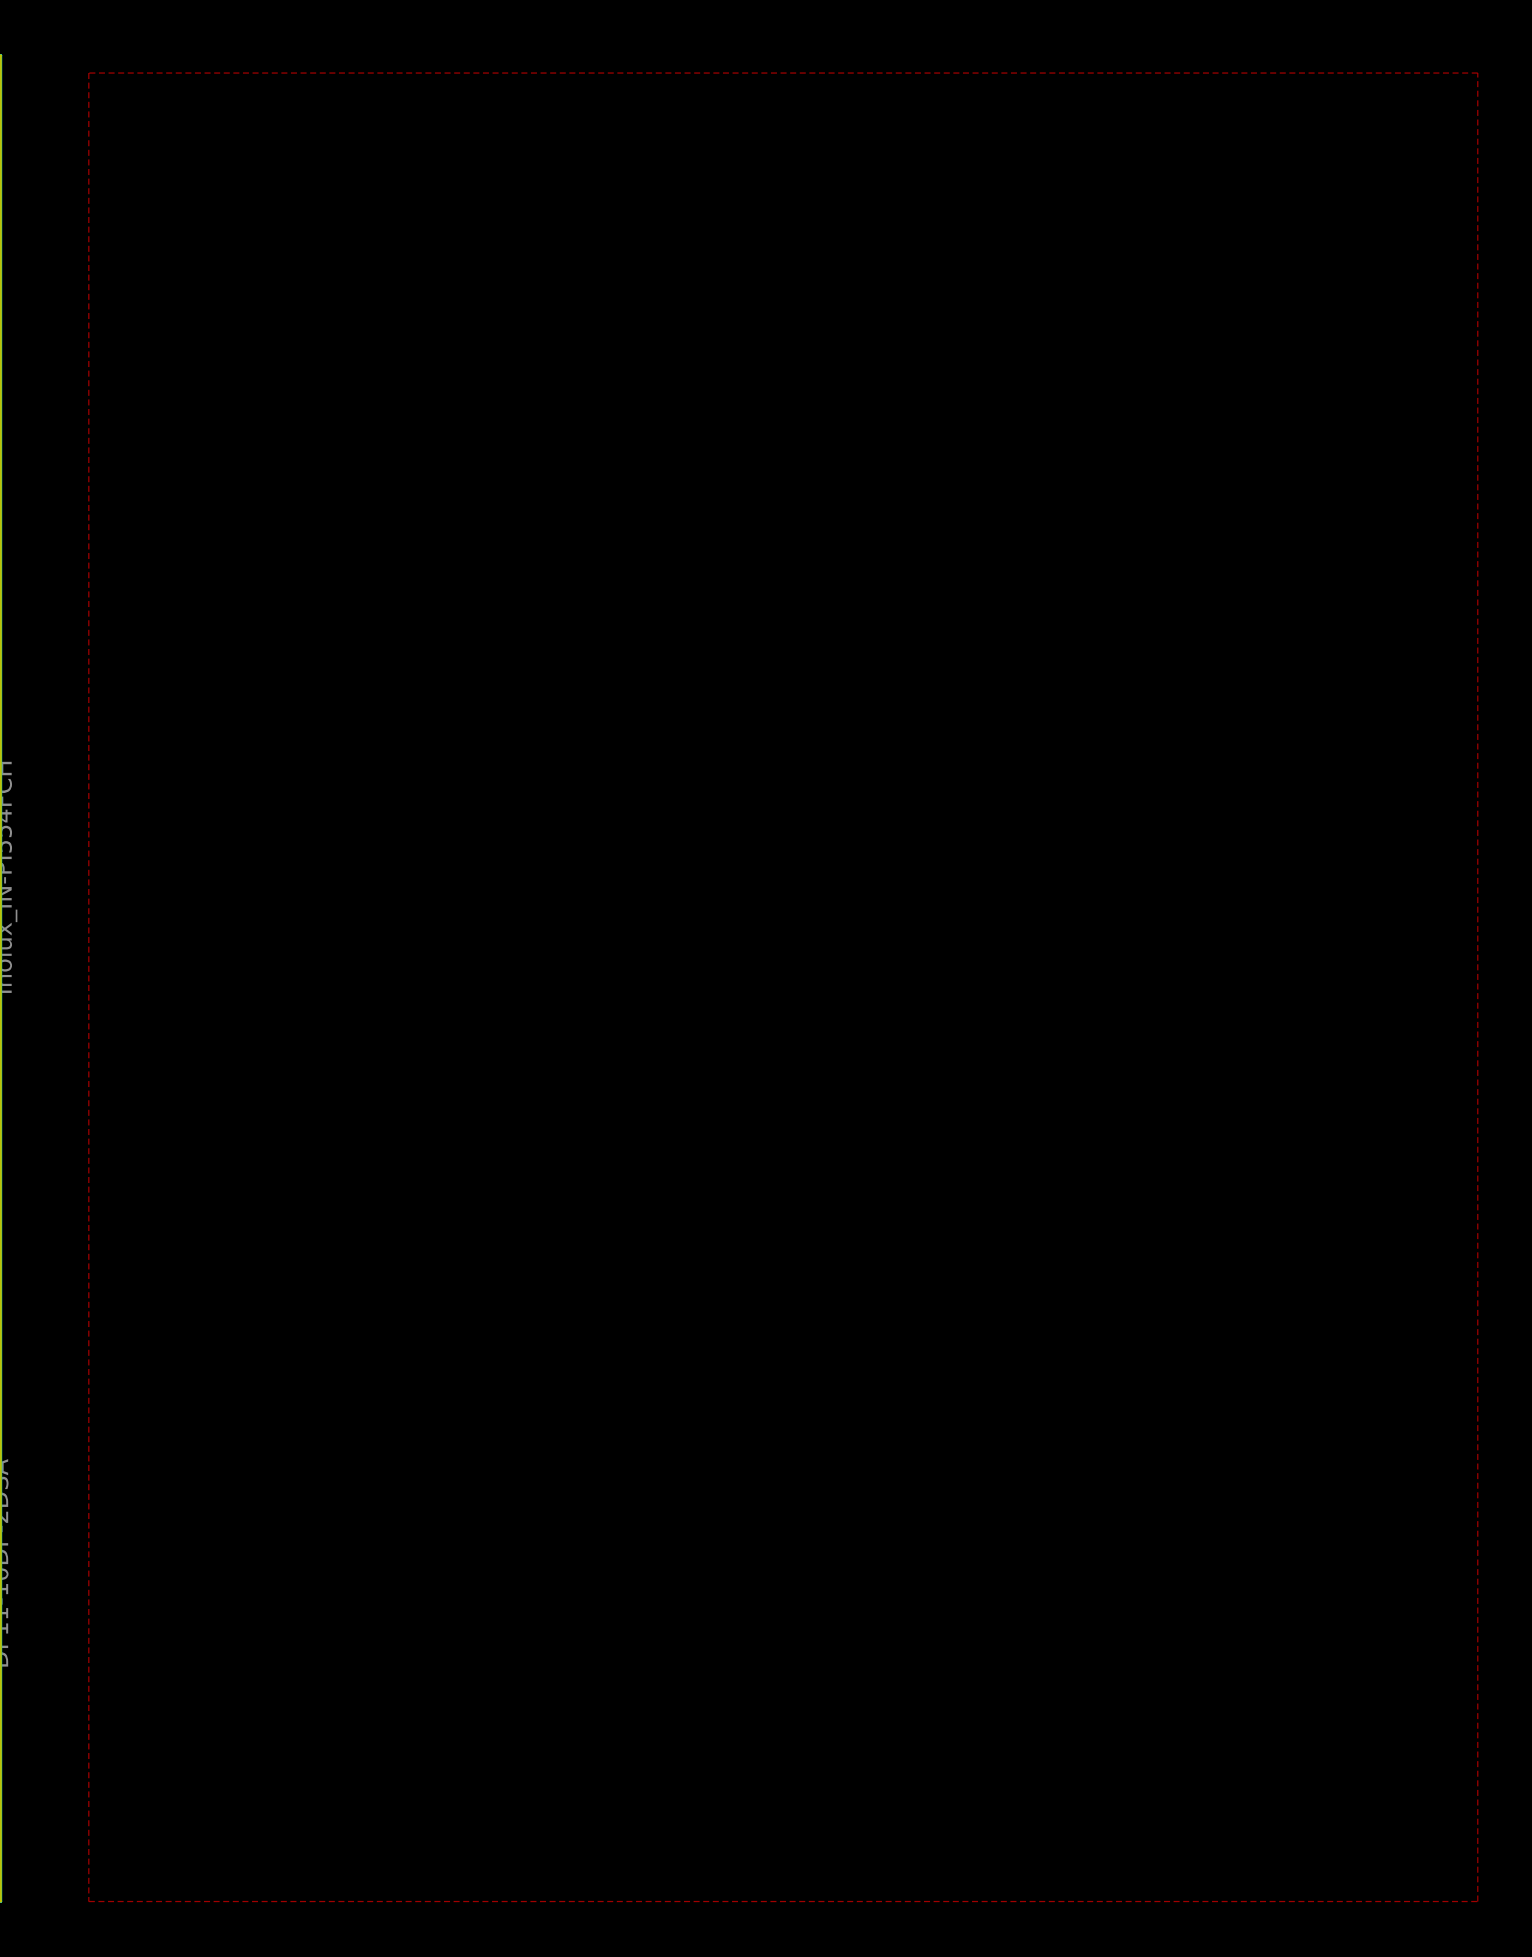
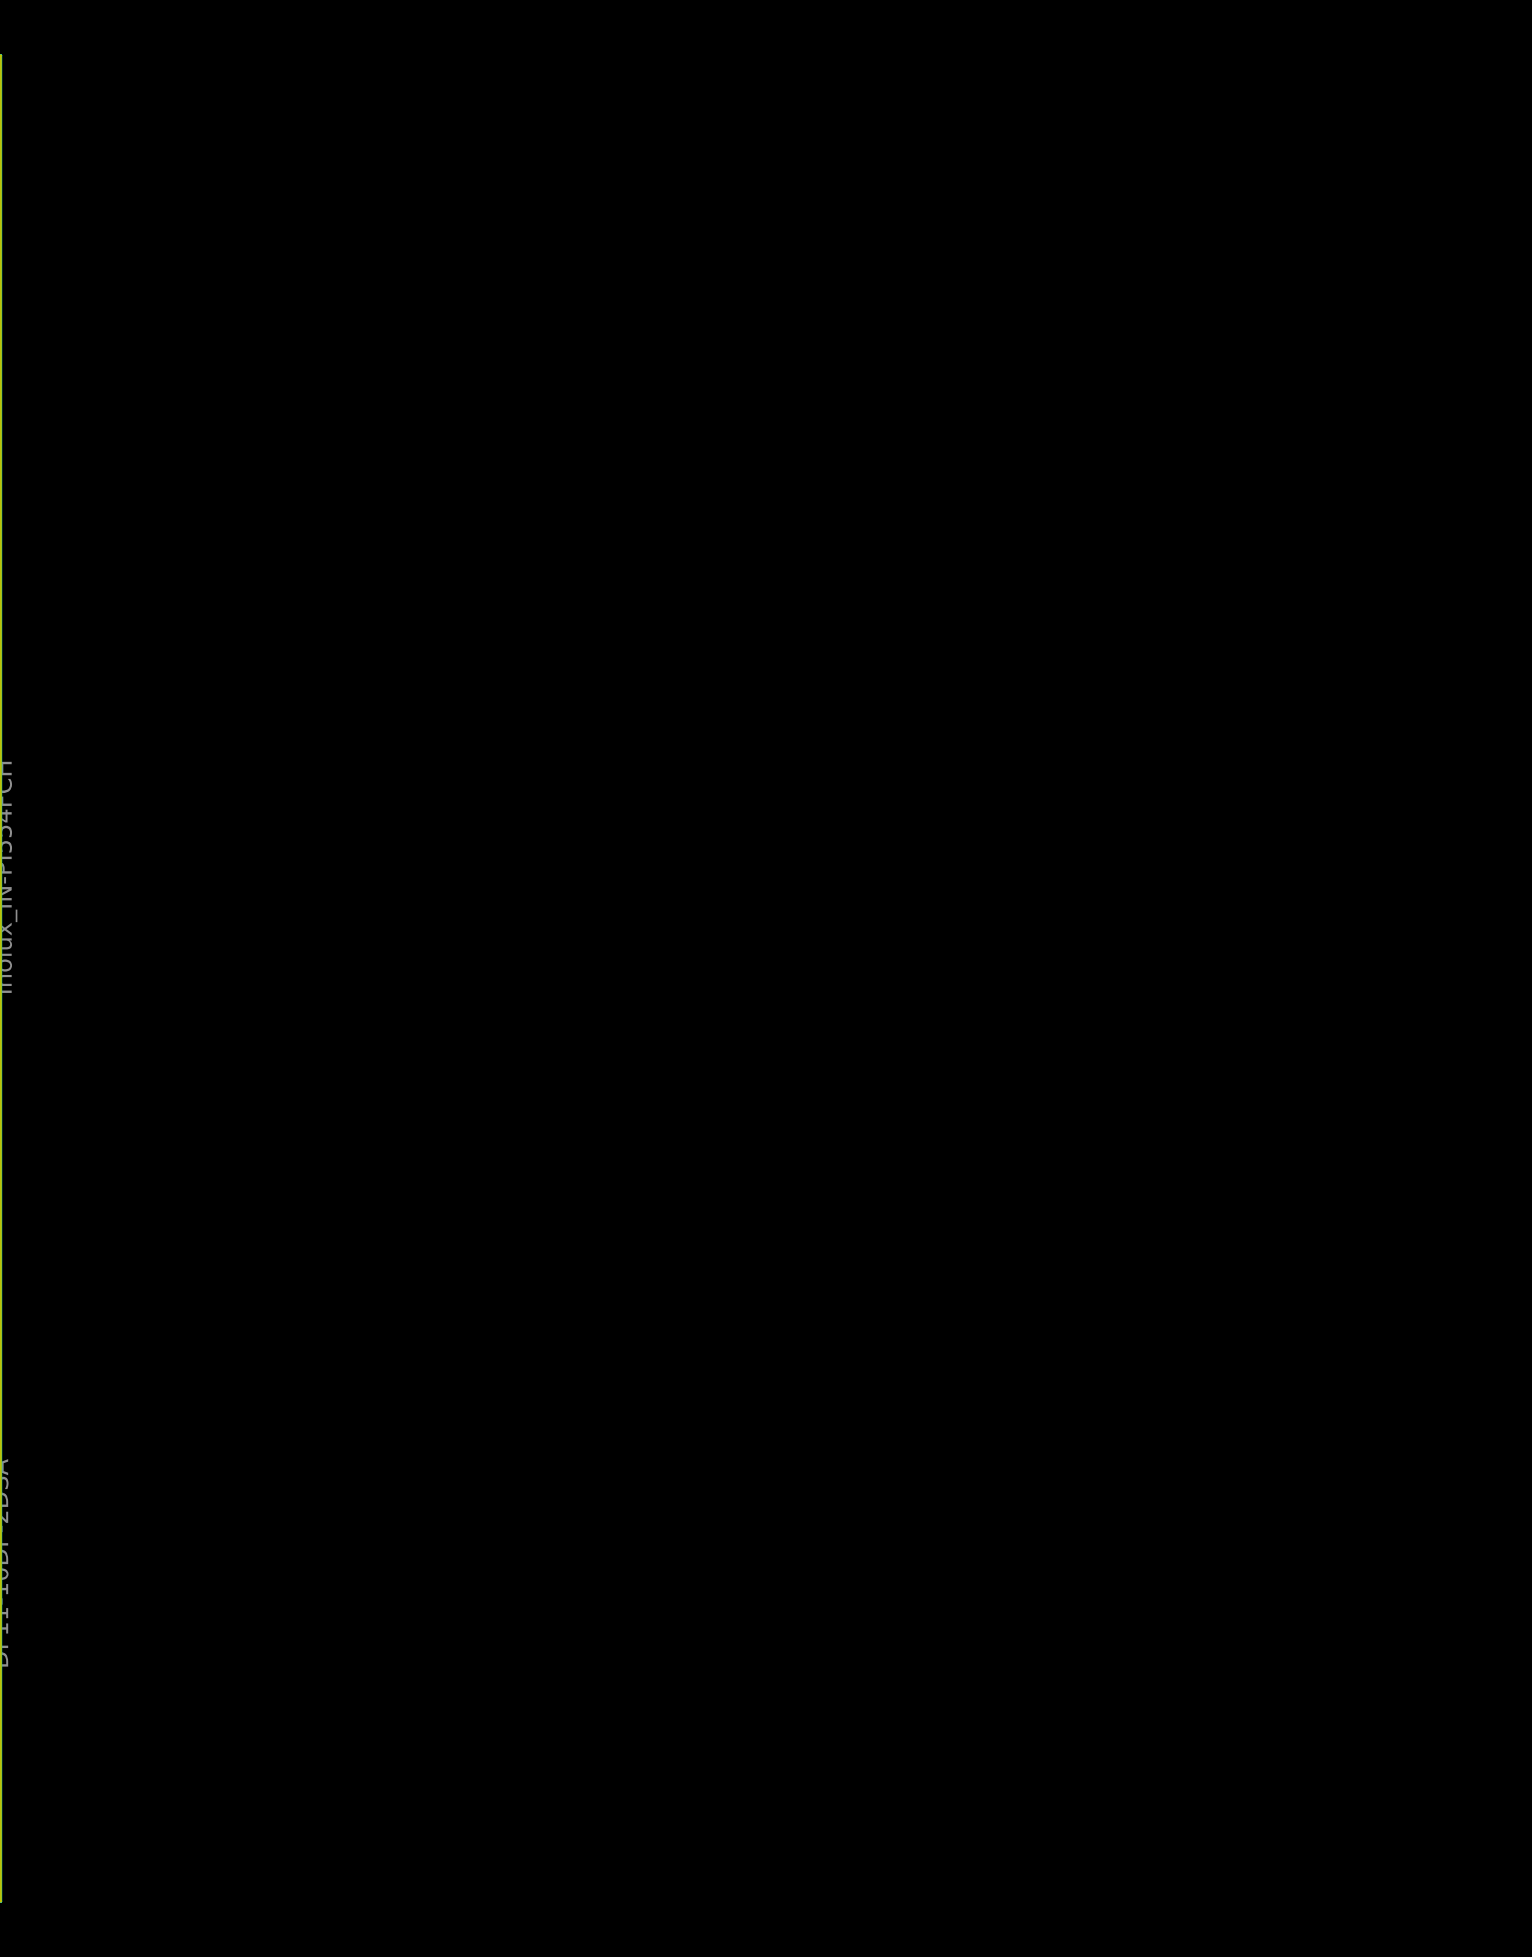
zone outline: (88, 73) (1477, 73) (1477, 1901) (88, 1901) (88, 73) -> none

